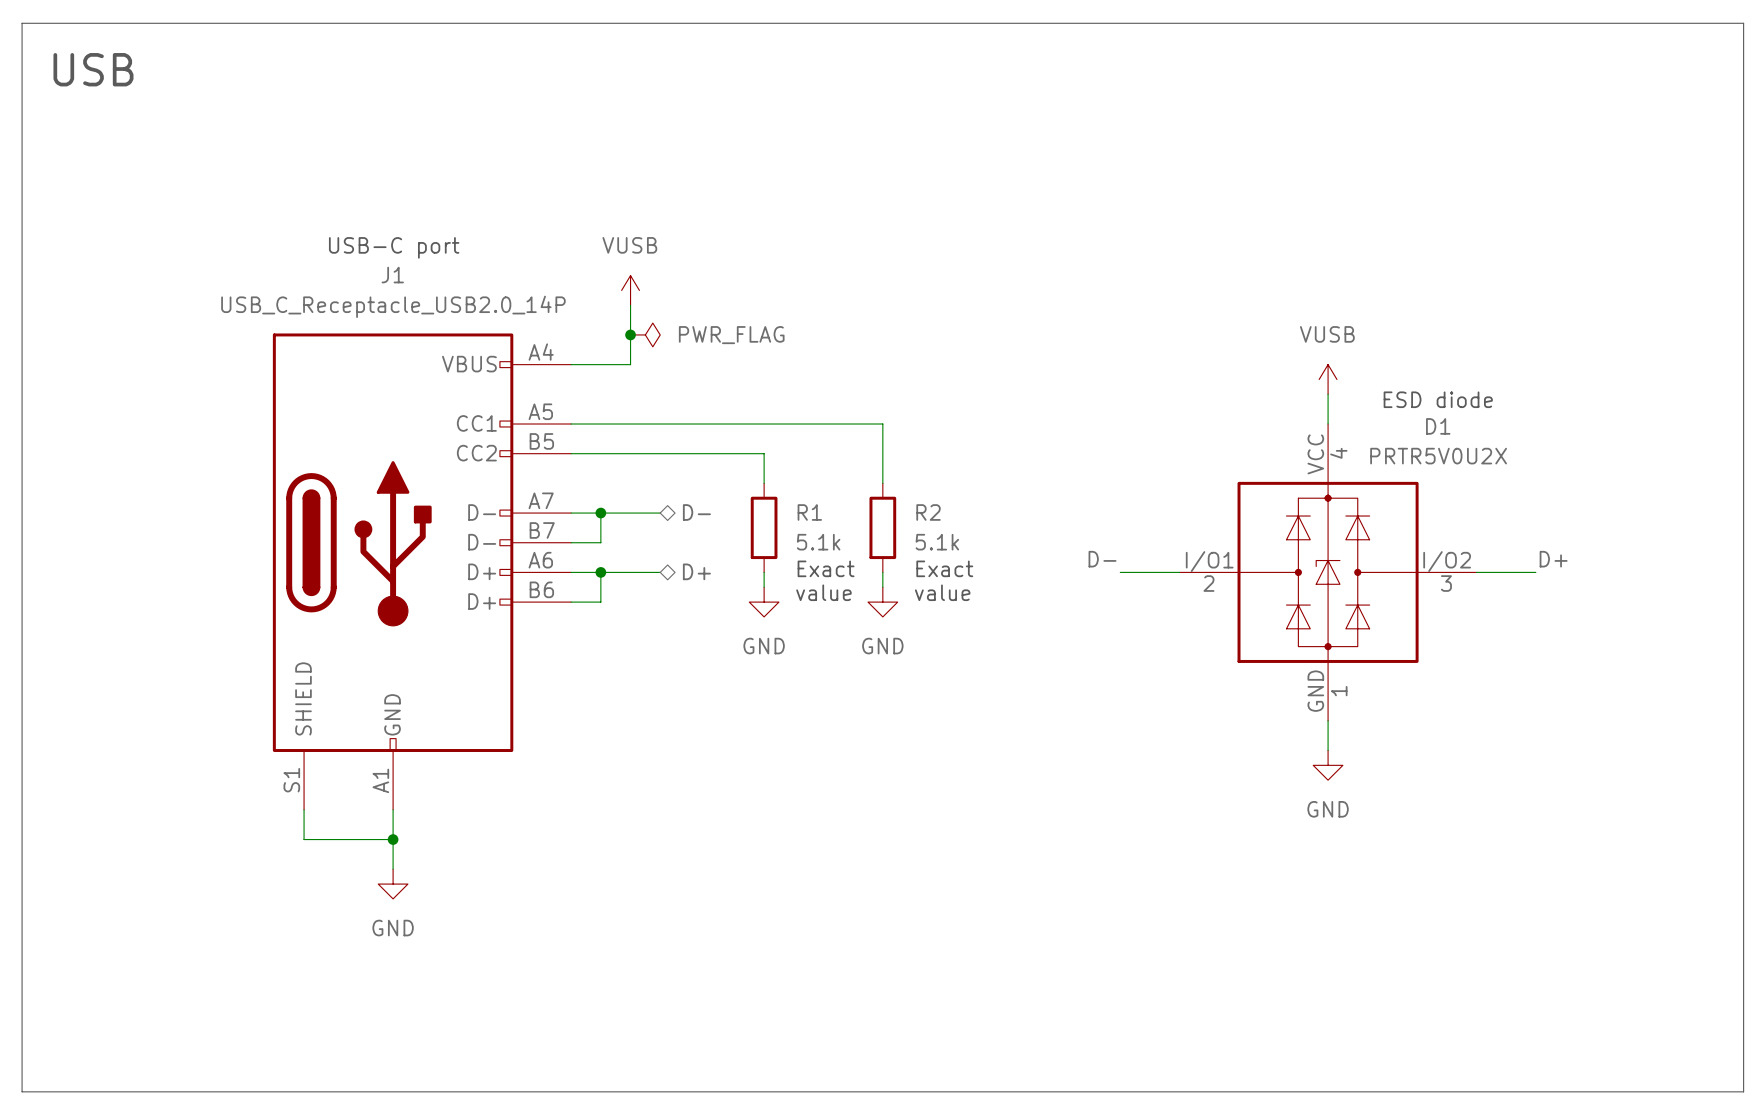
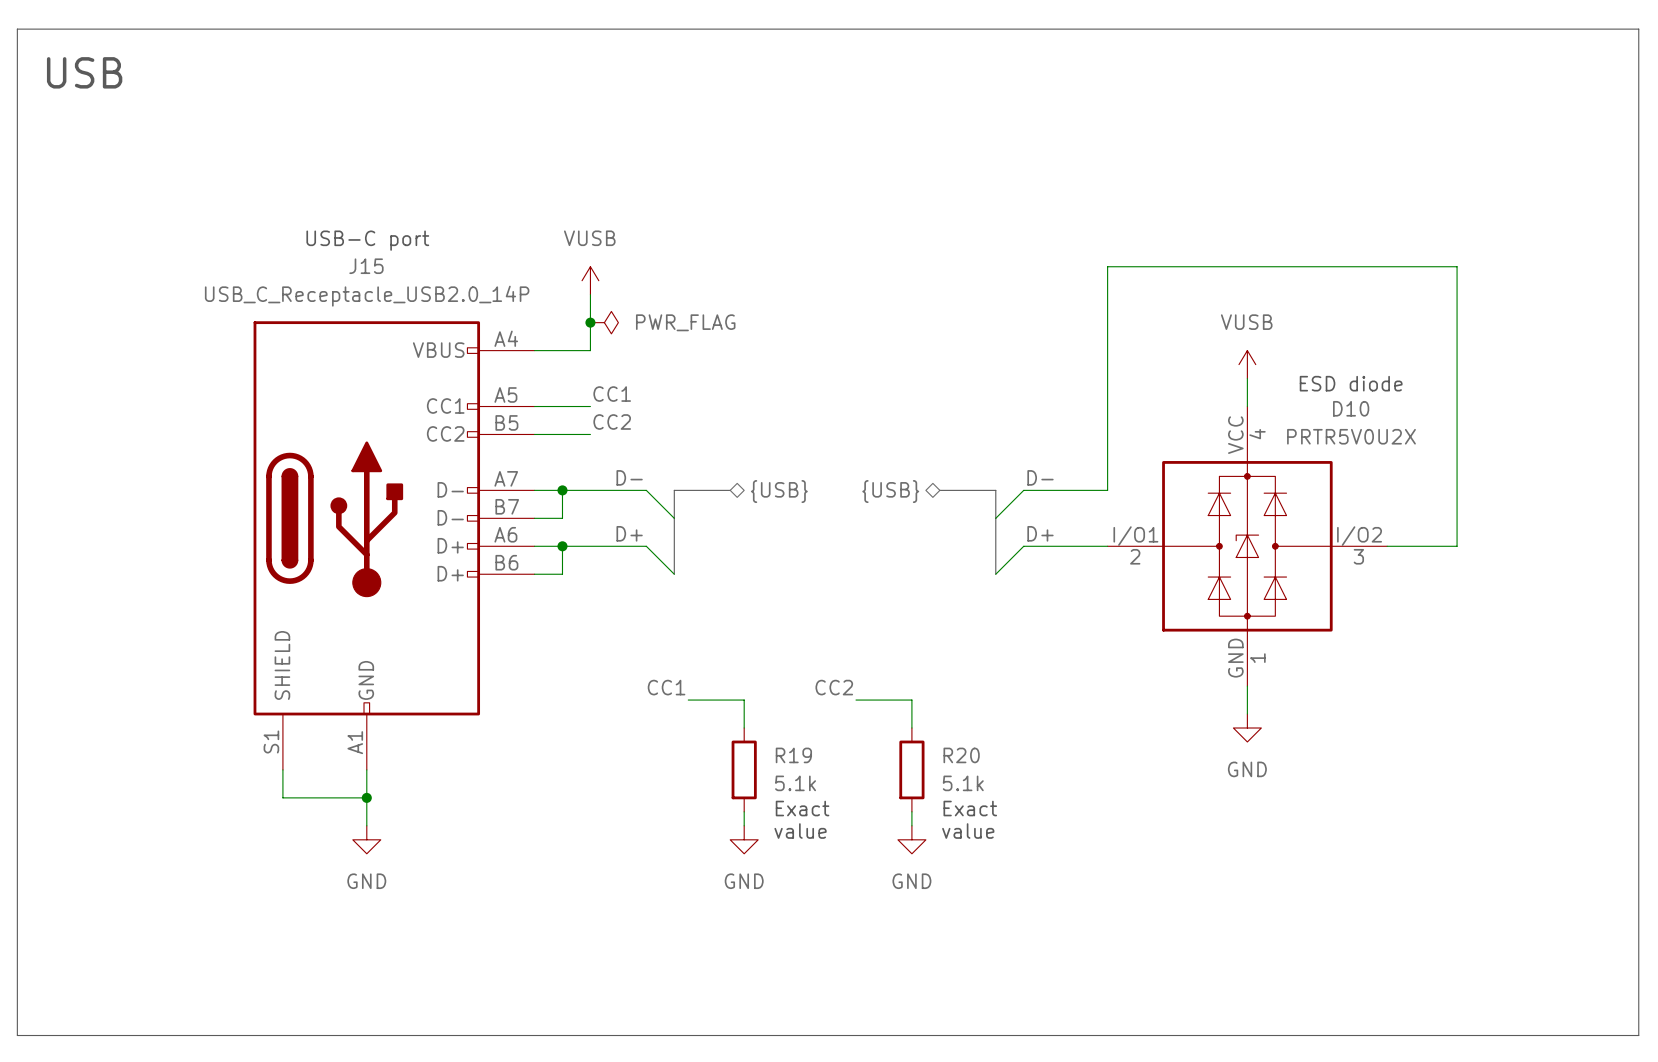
J1 name: J1 (392, 275) -> J15 (366, 266)
label: none -> CC1 (612, 394)
wire: (630, 424) (882, 424) (882, 483) -> none
D1 name: D1 (1438, 426) -> D10 (1351, 408)
label: none -> CC2 (612, 422)
wire: (630, 453) (764, 453) (764, 483) -> none
label: none -> D- (629, 477)
hierarchical label: D- (696, 512) -> none
wire: none -> (618, 490) (646, 490) (674, 518)
bus: none -> (730, 490) (674, 490) (674, 574)
bus: none -> (939, 490) (995, 490) (995, 574)
hierarchical label: none -> {USB} (779, 491)
hierarchical label: none -> {USB} (890, 491)
R1: 5.1k (764, 527) -> none
R2: 5.1k (882, 527) -> none
wire: none -> (995, 518) (1023, 490) (1107, 490) (1107, 266) (1457, 266) (1457, 546) (1443, 546)
label: none -> D+ (629, 533)
label position: D- (1102, 559) -> D- (1040, 477)
label: none -> D+ (1040, 533)
label: D+ (1553, 559) -> none
text: Exact (826, 568) -> none
text: Exact (944, 568) -> none
hierarchical label: D+ (696, 571) -> none
wire: none -> (618, 546) (646, 546) (674, 574)
wire: (764, 572) (764, 587) -> (744, 811) (744, 825)
wire: (882, 572) (882, 587) -> none
wire: none -> (1051, 546) (1023, 546) (995, 574)
text: value (823, 592) -> none
text: value (942, 592) -> none
power symbol: GND (764, 602) -> none
power symbol: GND (882, 602) -> none
label: none -> CC1 (666, 687)
label: none -> CC2 (834, 687)
wire: none -> (688, 700) (744, 700) (744, 728)
wire: none -> (856, 700) (911, 700) (911, 728)
R19: none -> 5.1k (744, 769)
R20: none -> 5.1k (911, 769)
text: none -> Exact (802, 808)
text: none -> Exact (970, 808)
wire: none -> (911, 811) (911, 825)
text: none -> value (800, 831)
text: none -> value (968, 831)
power symbol: none -> GND (744, 839)
power symbol: none -> GND (911, 839)

